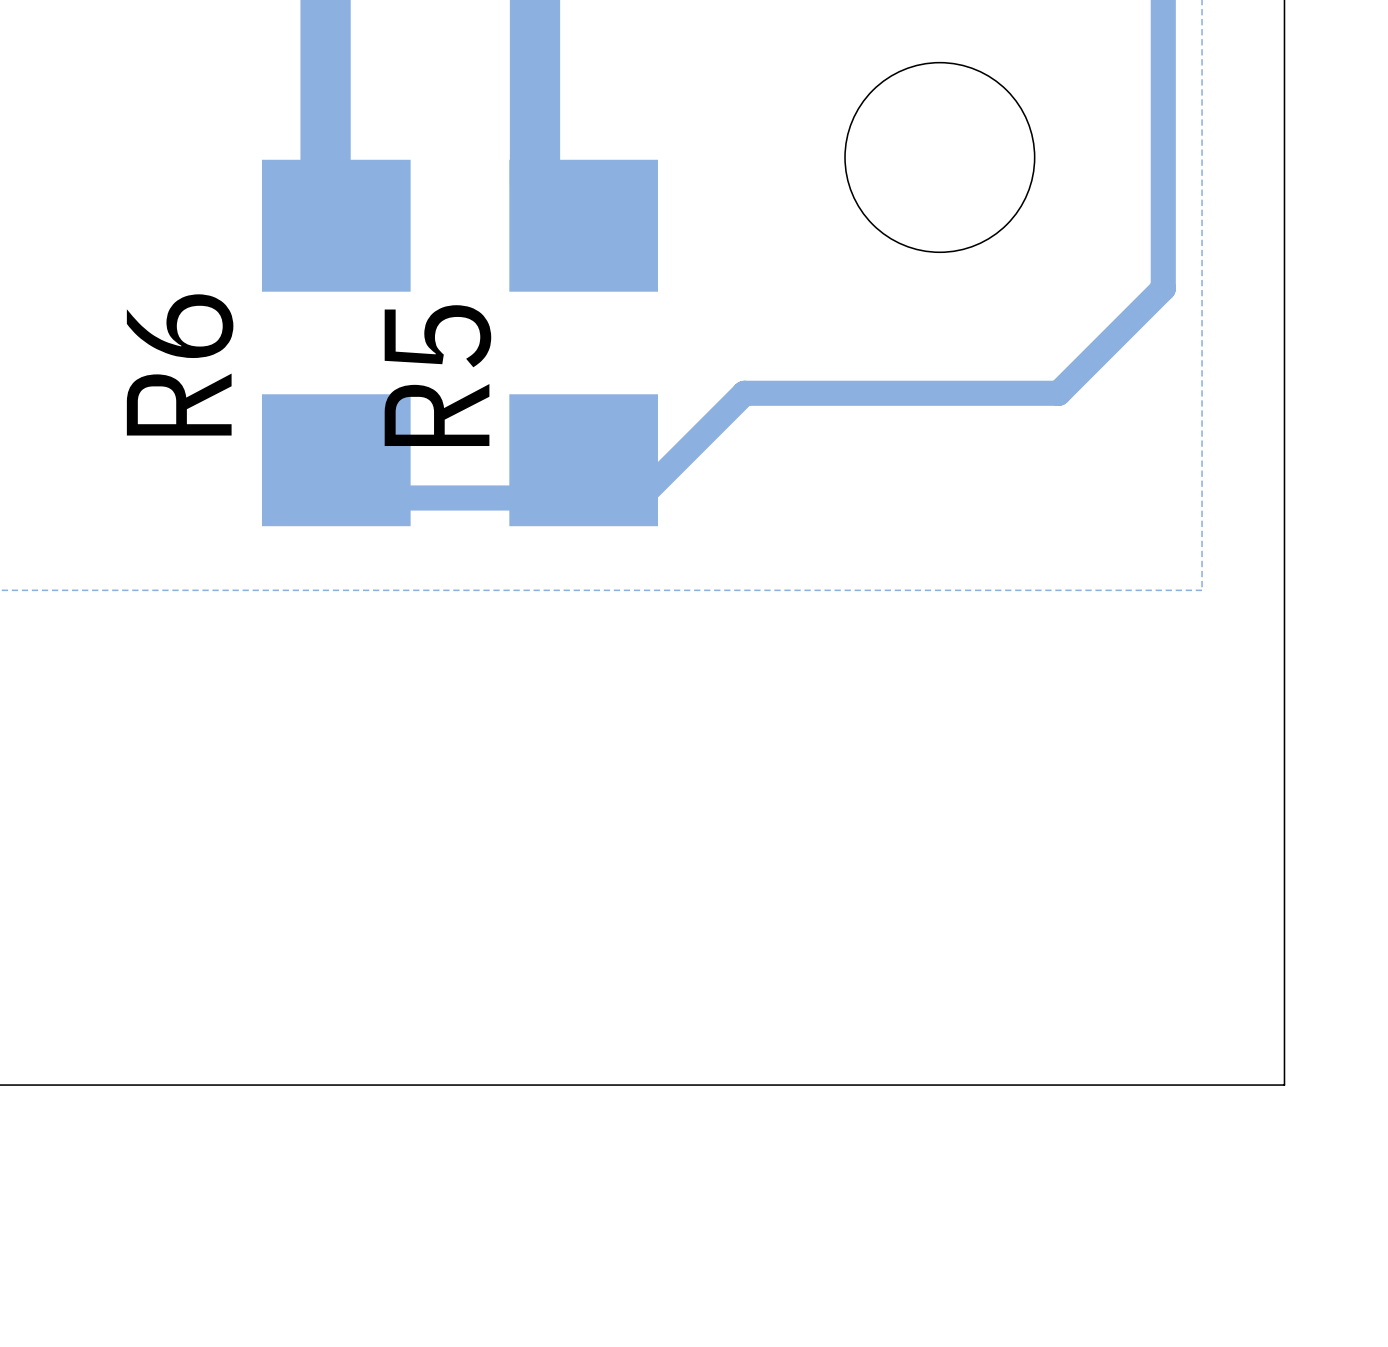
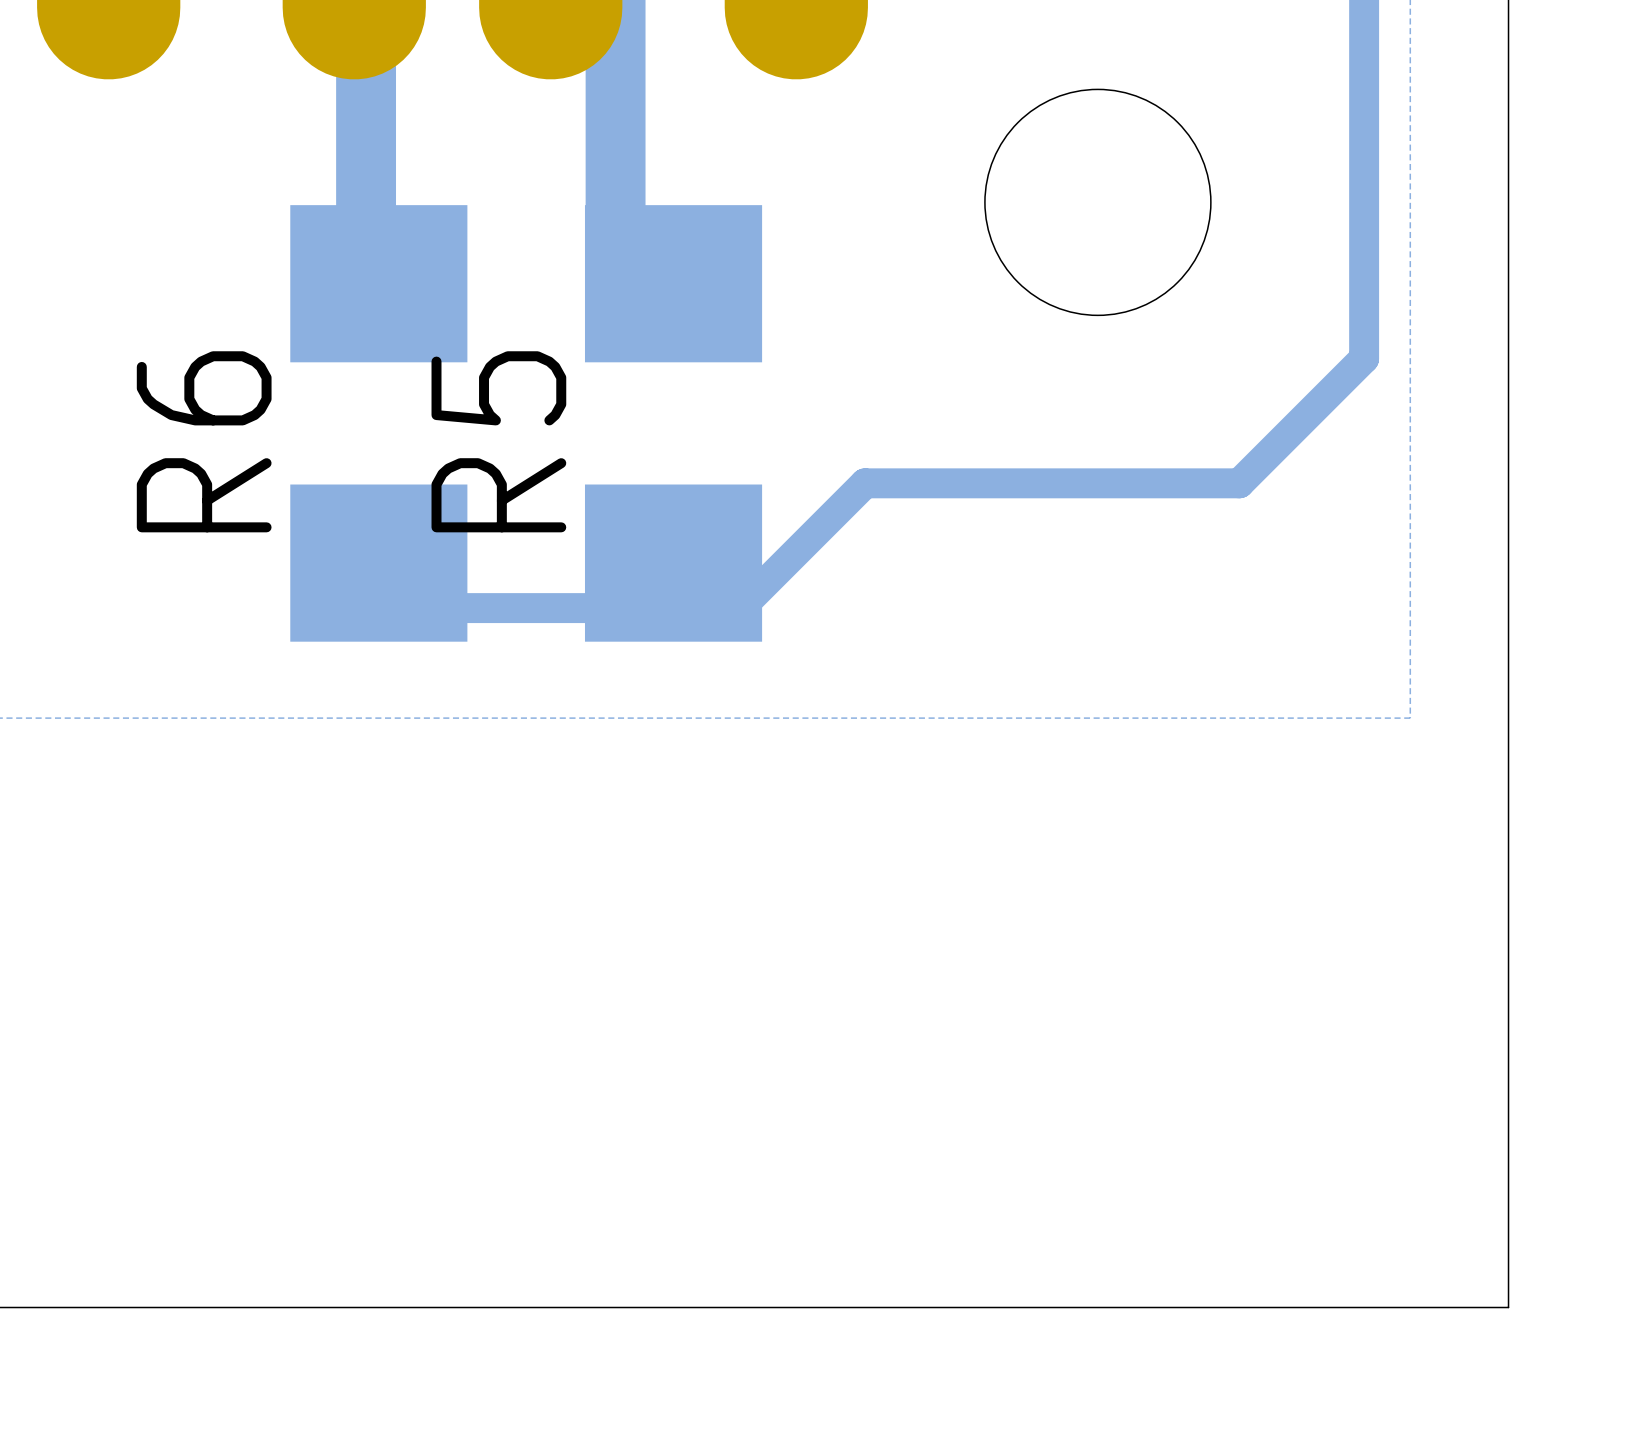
R6 name position: R6 (180, 364) -> R6 (204, 441)

